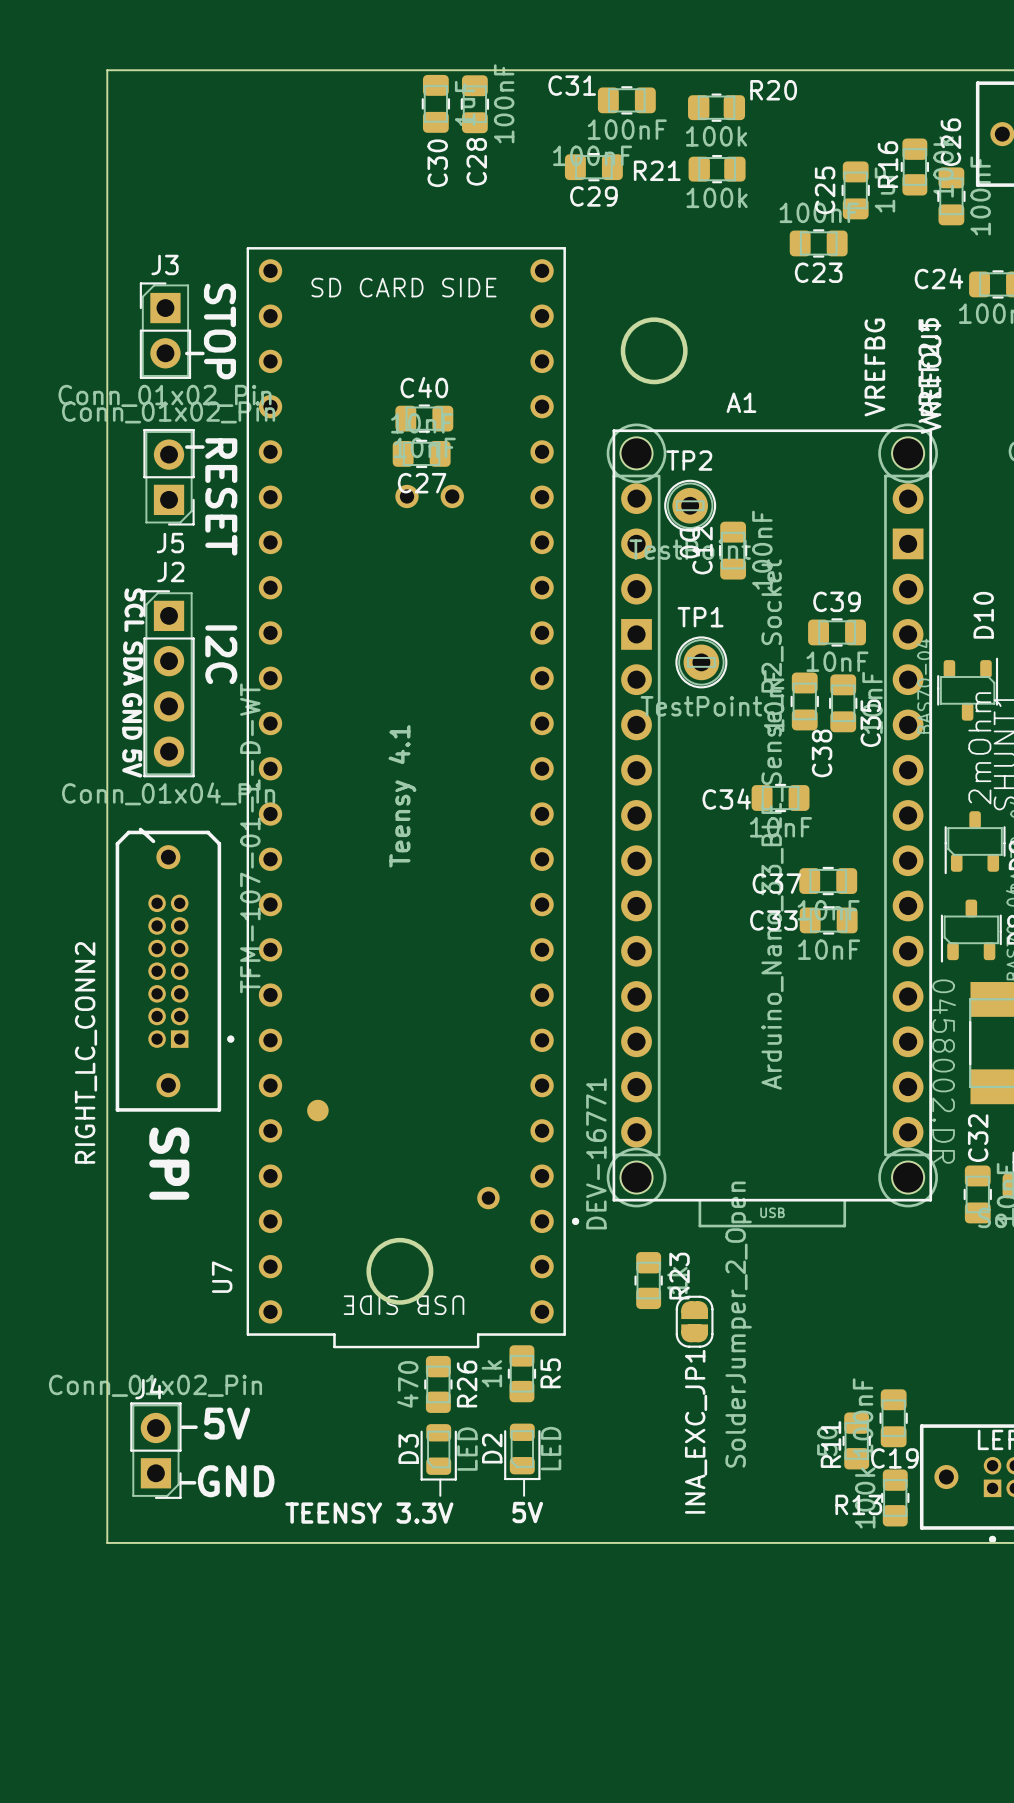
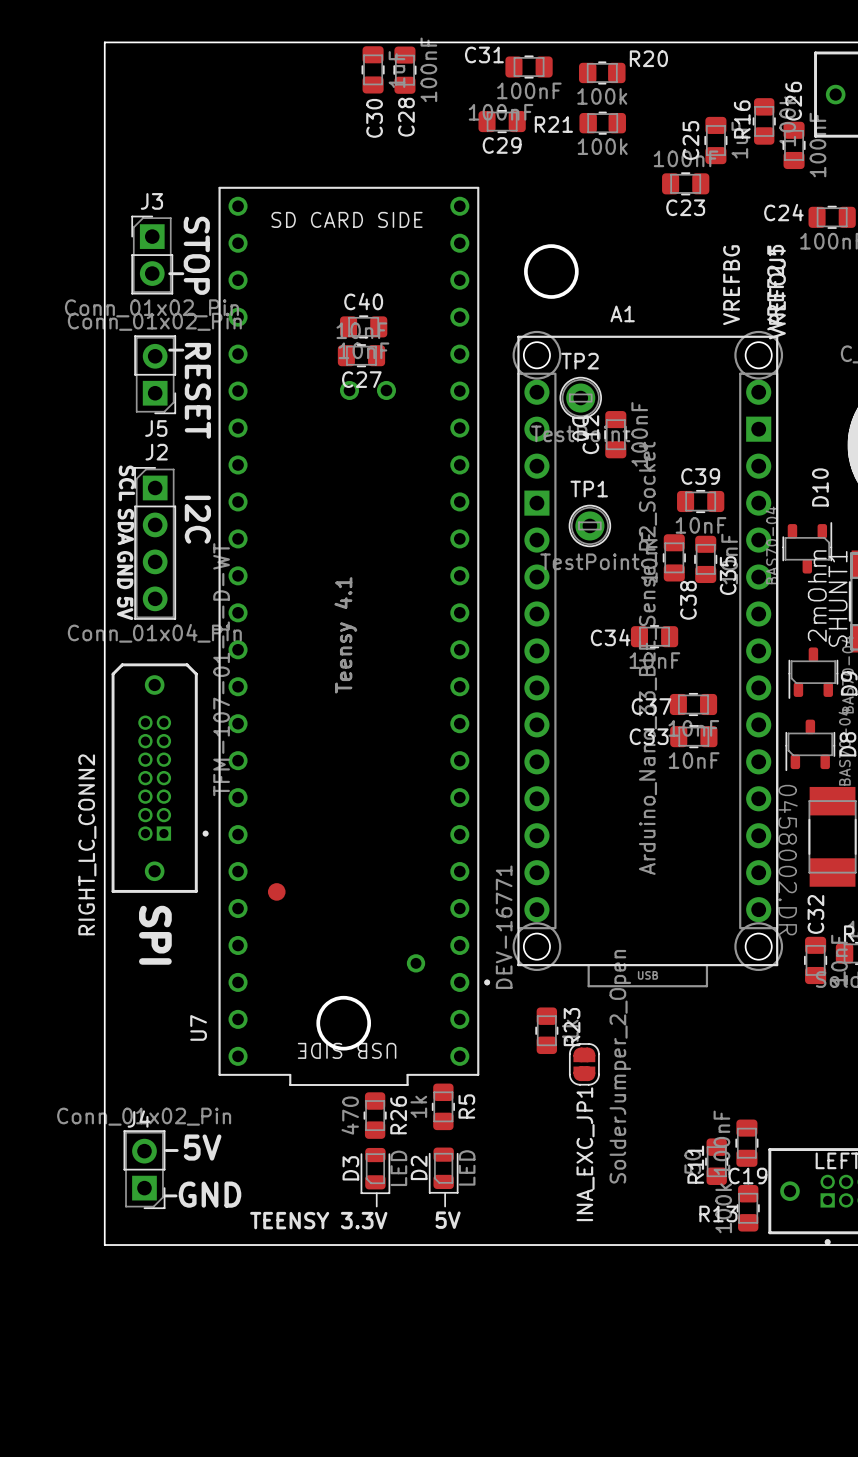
line: (140, 829) (153, 841) -> none

